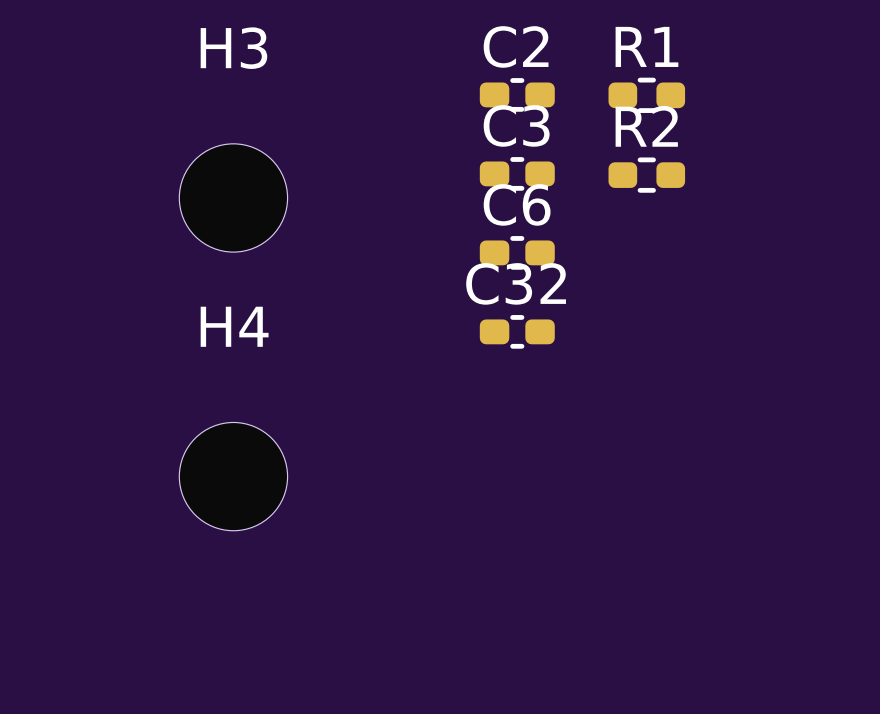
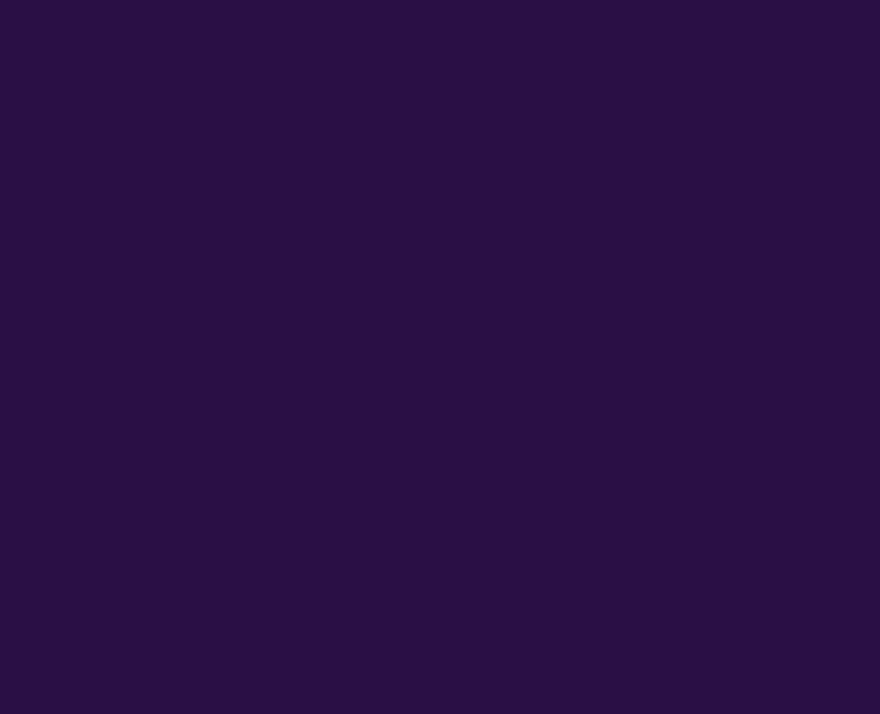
C2: (517, 94) -> none
R1: (646, 95) -> none
C3: (517, 173) -> none
R2: (646, 175) -> none
H3: (233, 197) -> none
C6: (517, 252) -> none
C32: (517, 331) -> none
H4: (233, 476) -> none

